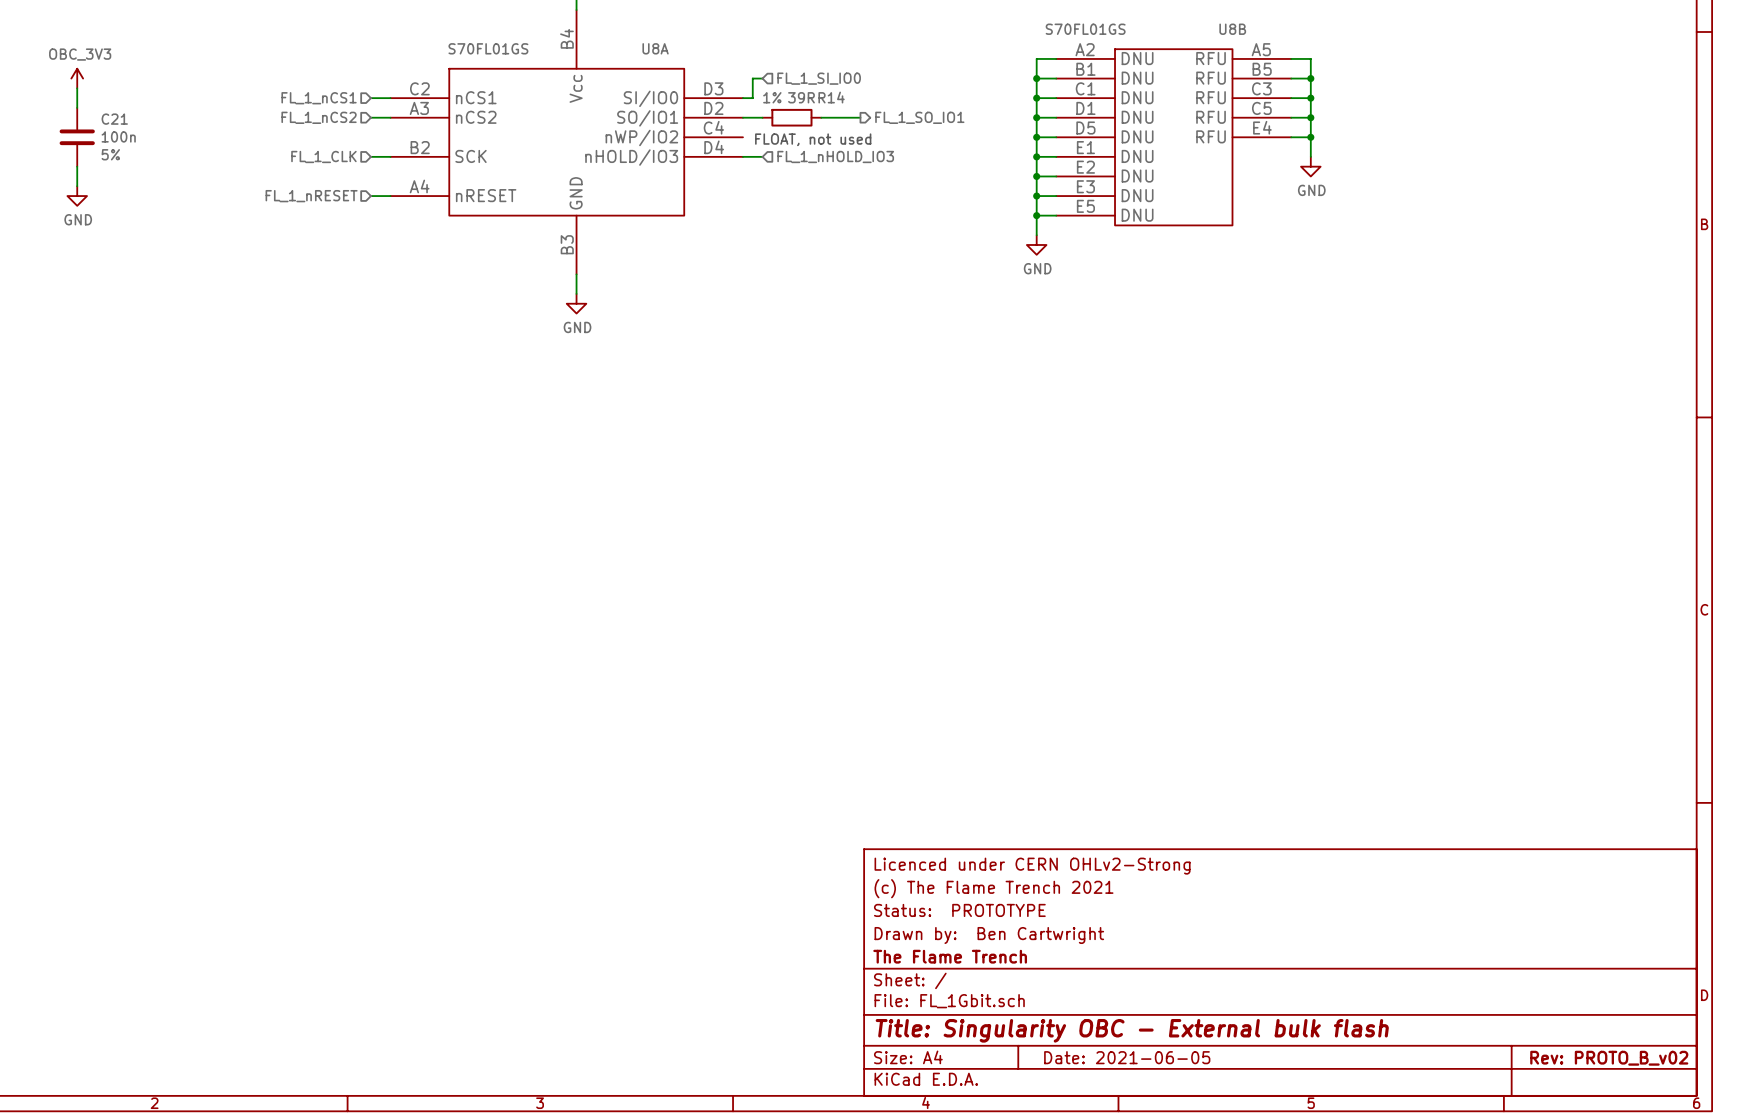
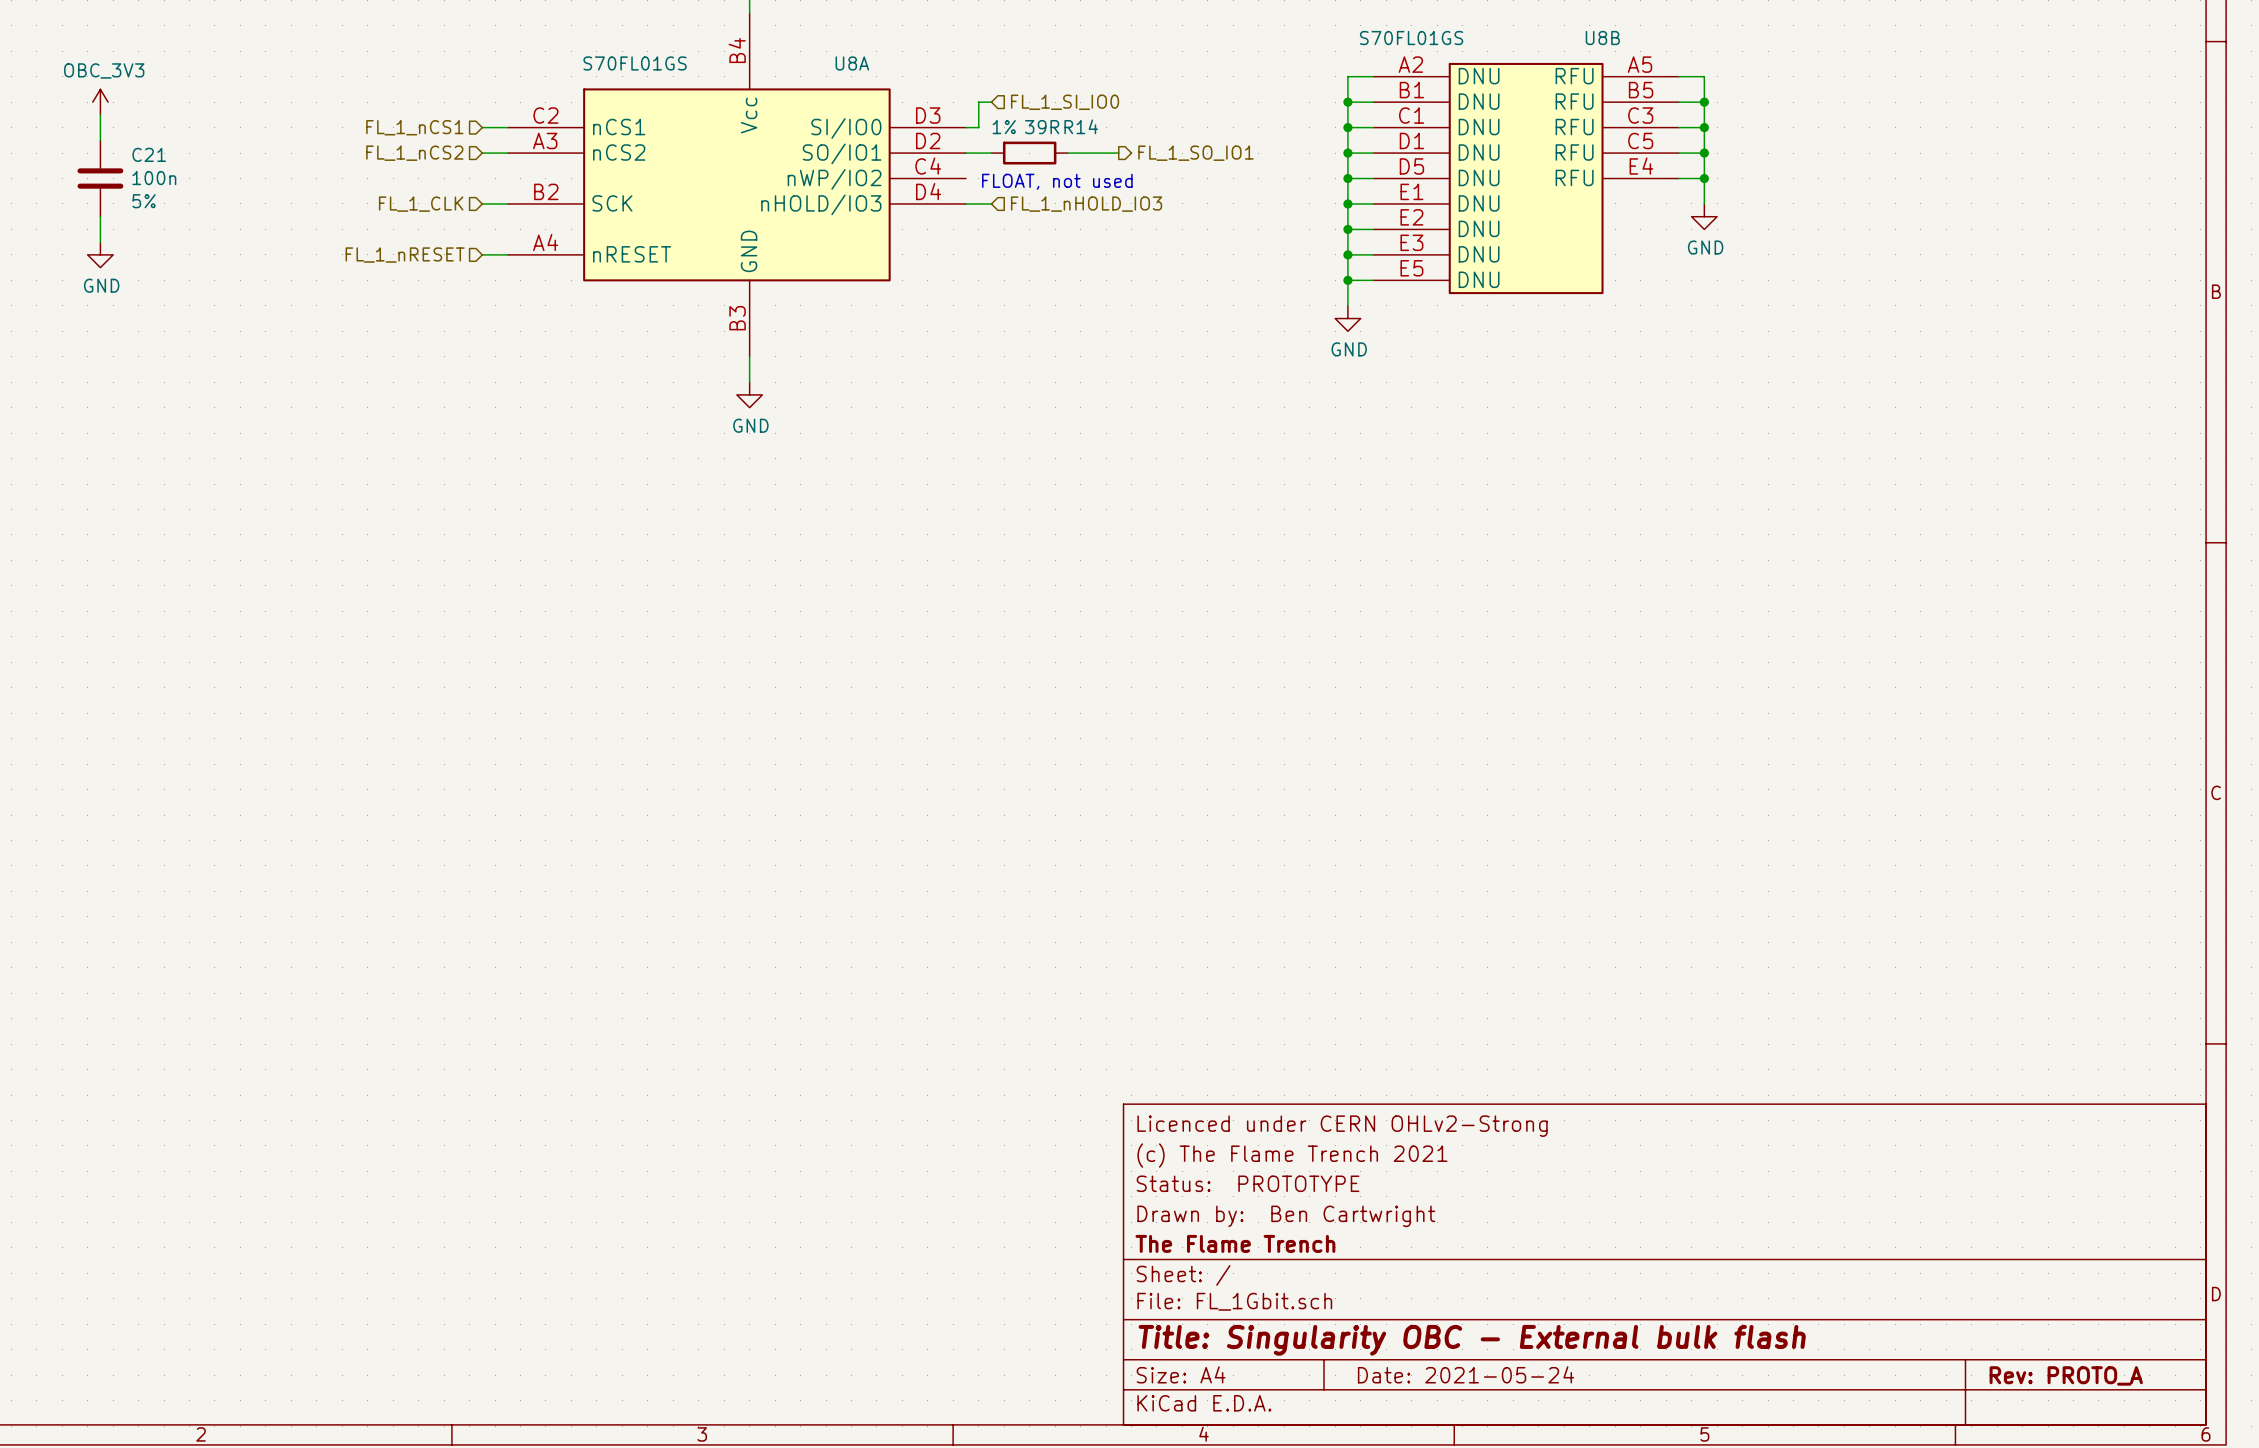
title block: Date: 2021-06-05 (1127, 1057) -> Date: 2021-05-24 (1466, 1374)
title block: Rev: PROTO_B_v02 (1609, 1058) -> Rev: PROTO_A (2066, 1375)

